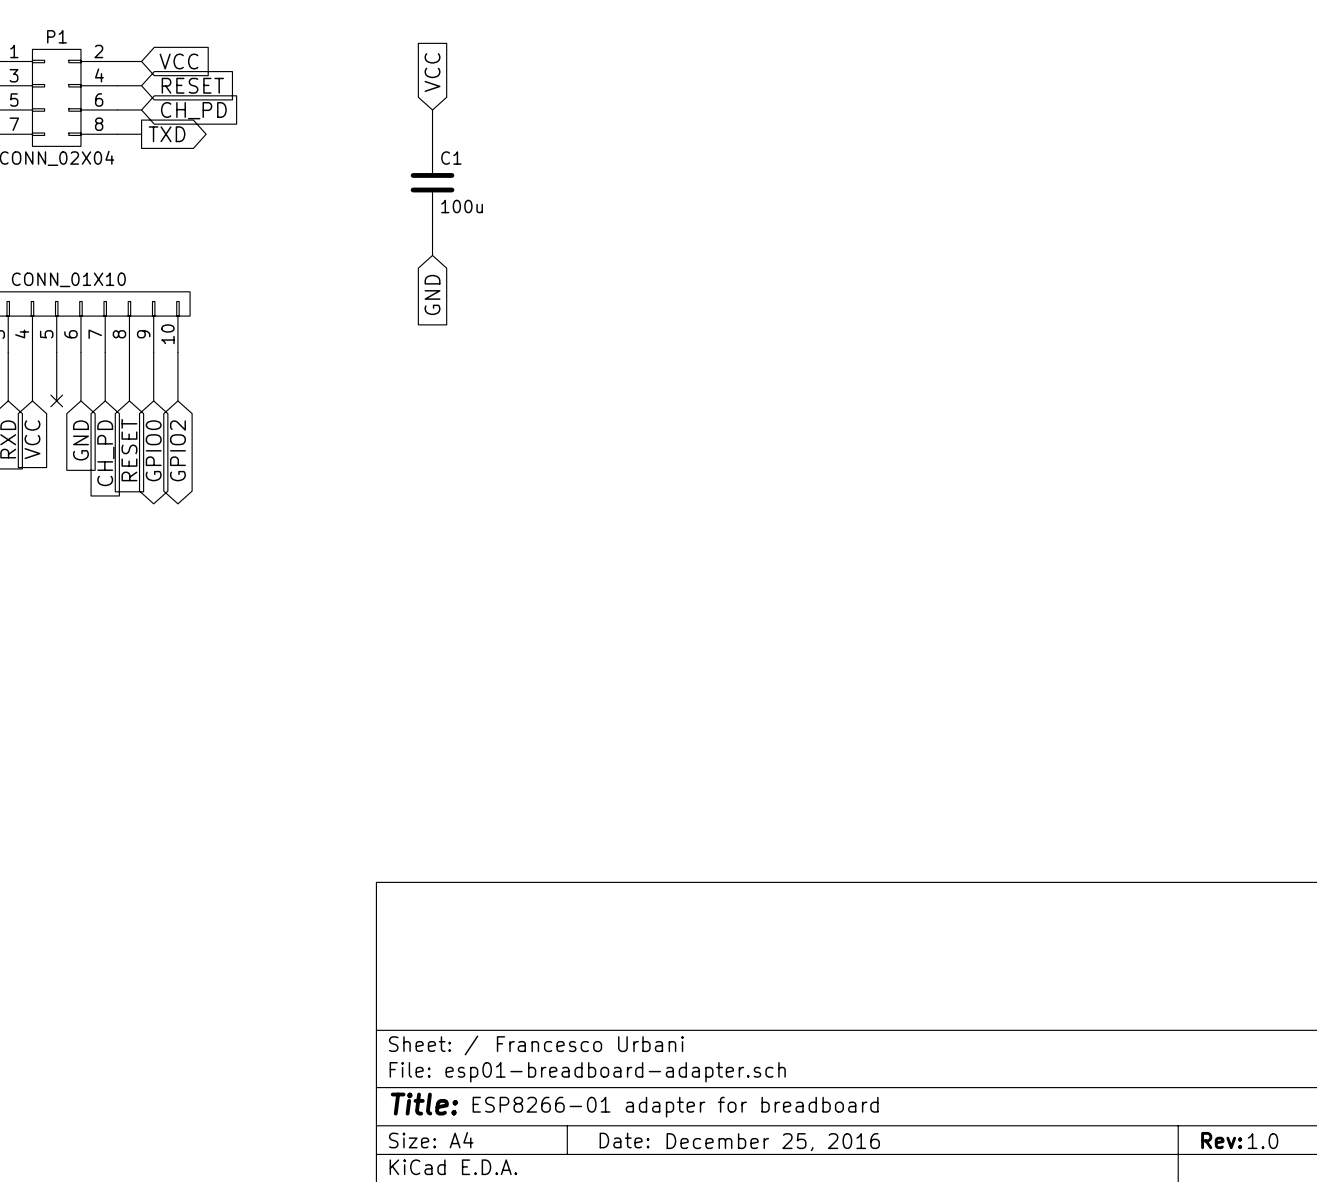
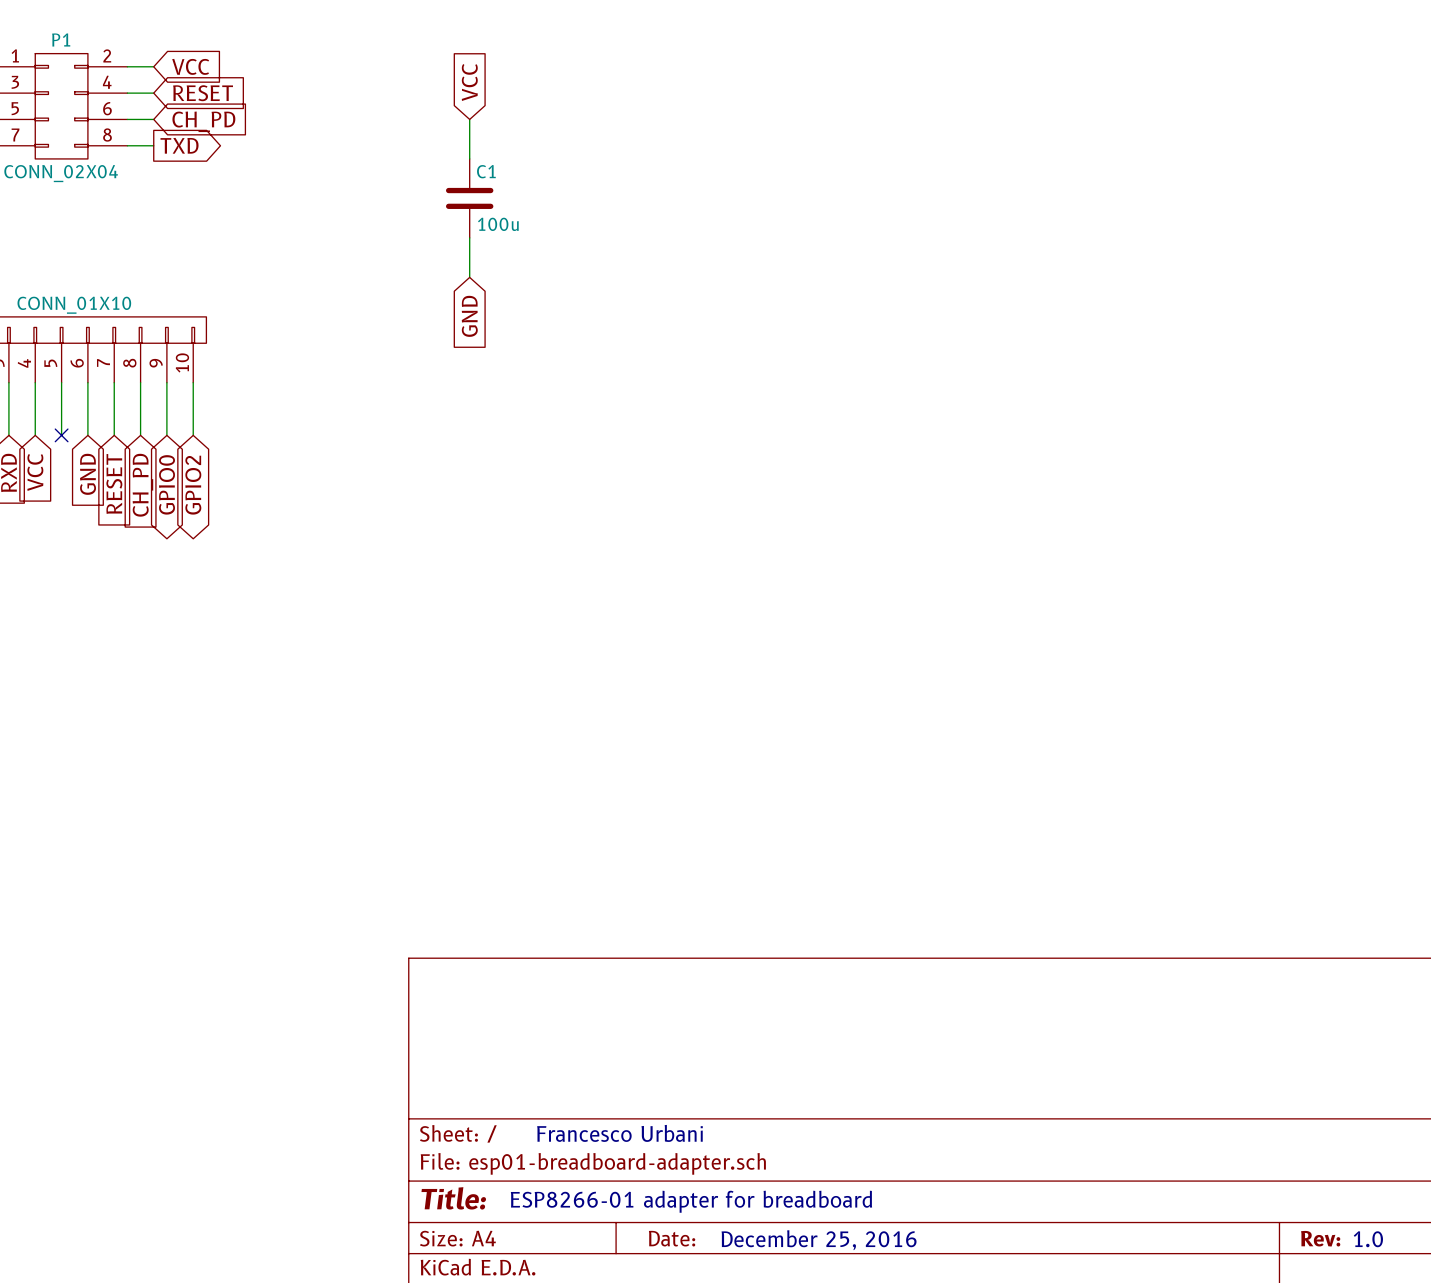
global label: RESET (129, 450) -> CH_PD (142, 485)
global label: CH_PD (105, 453) -> RESET (114, 483)

